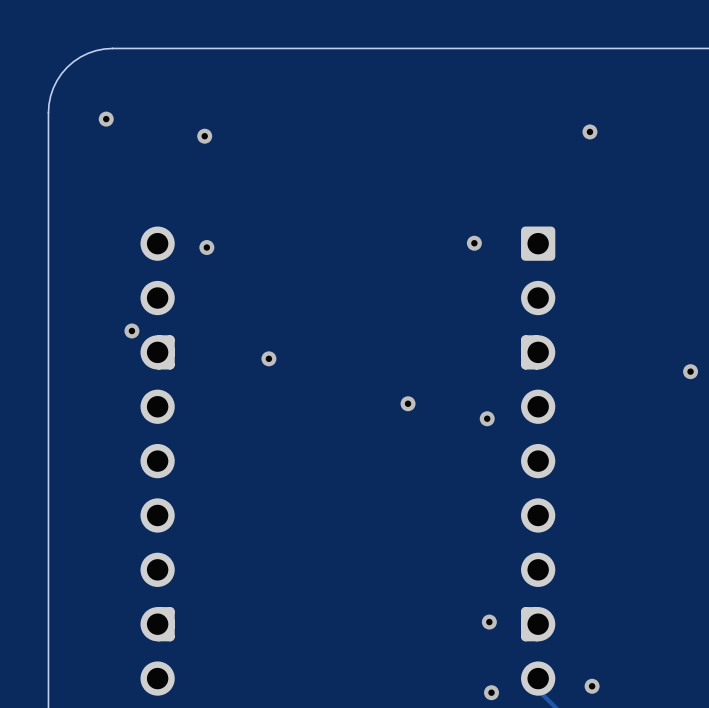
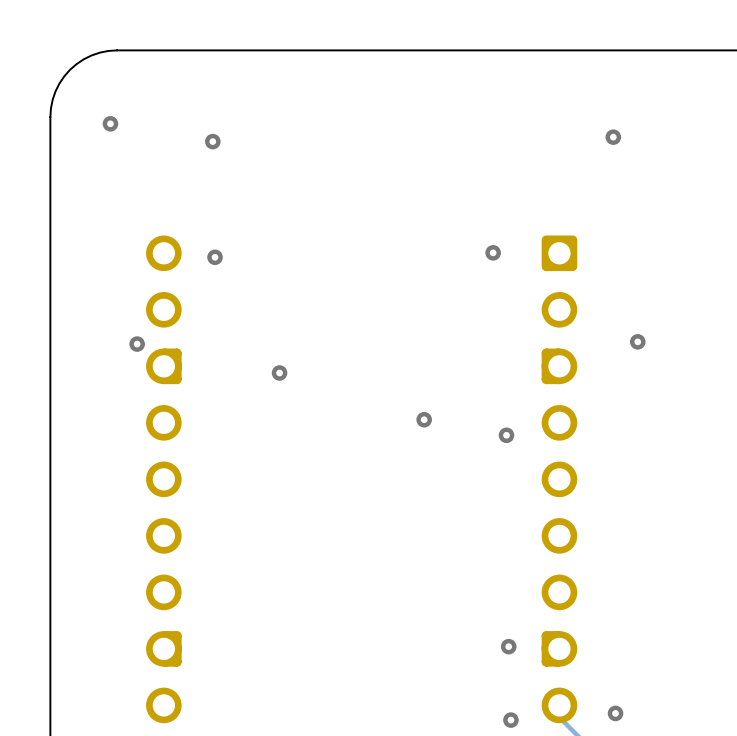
via position: (690, 371) -> (637, 341)

